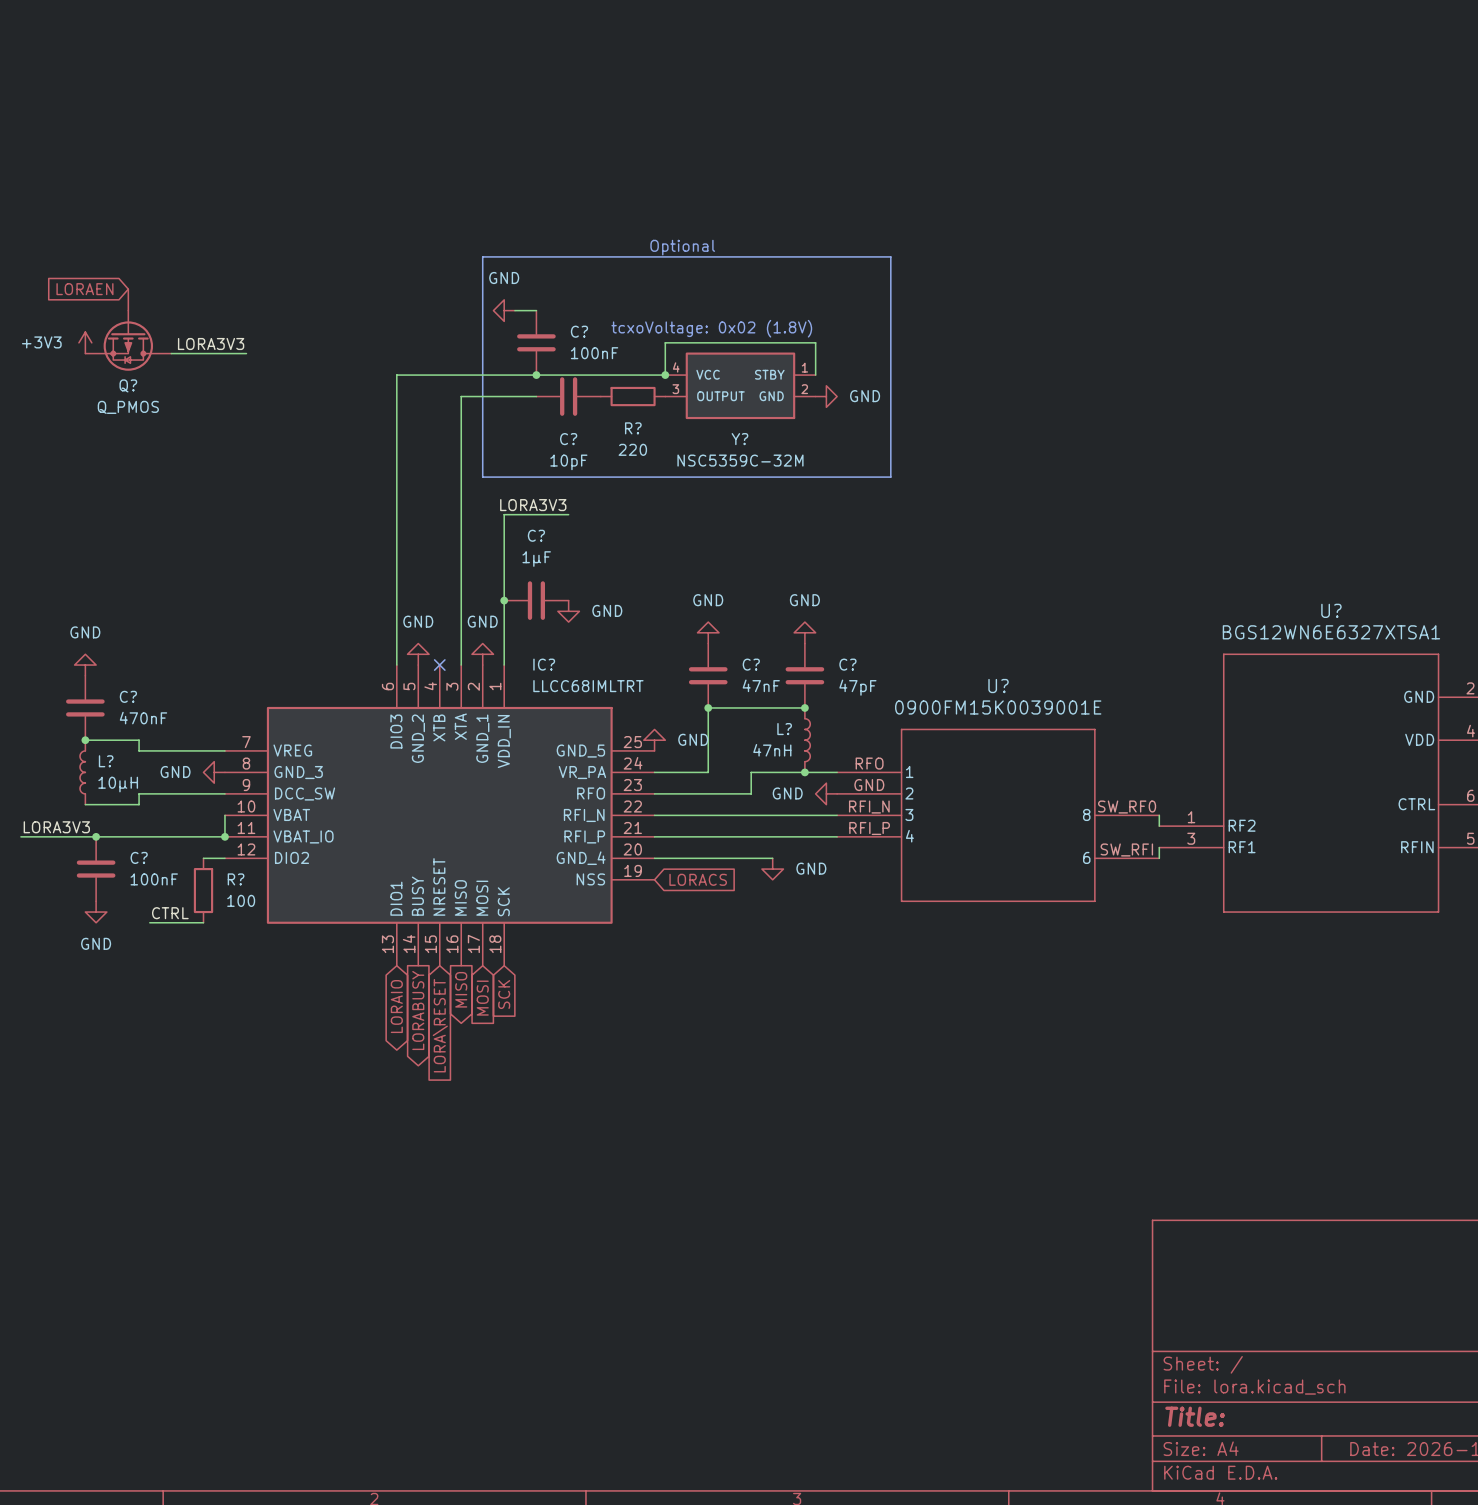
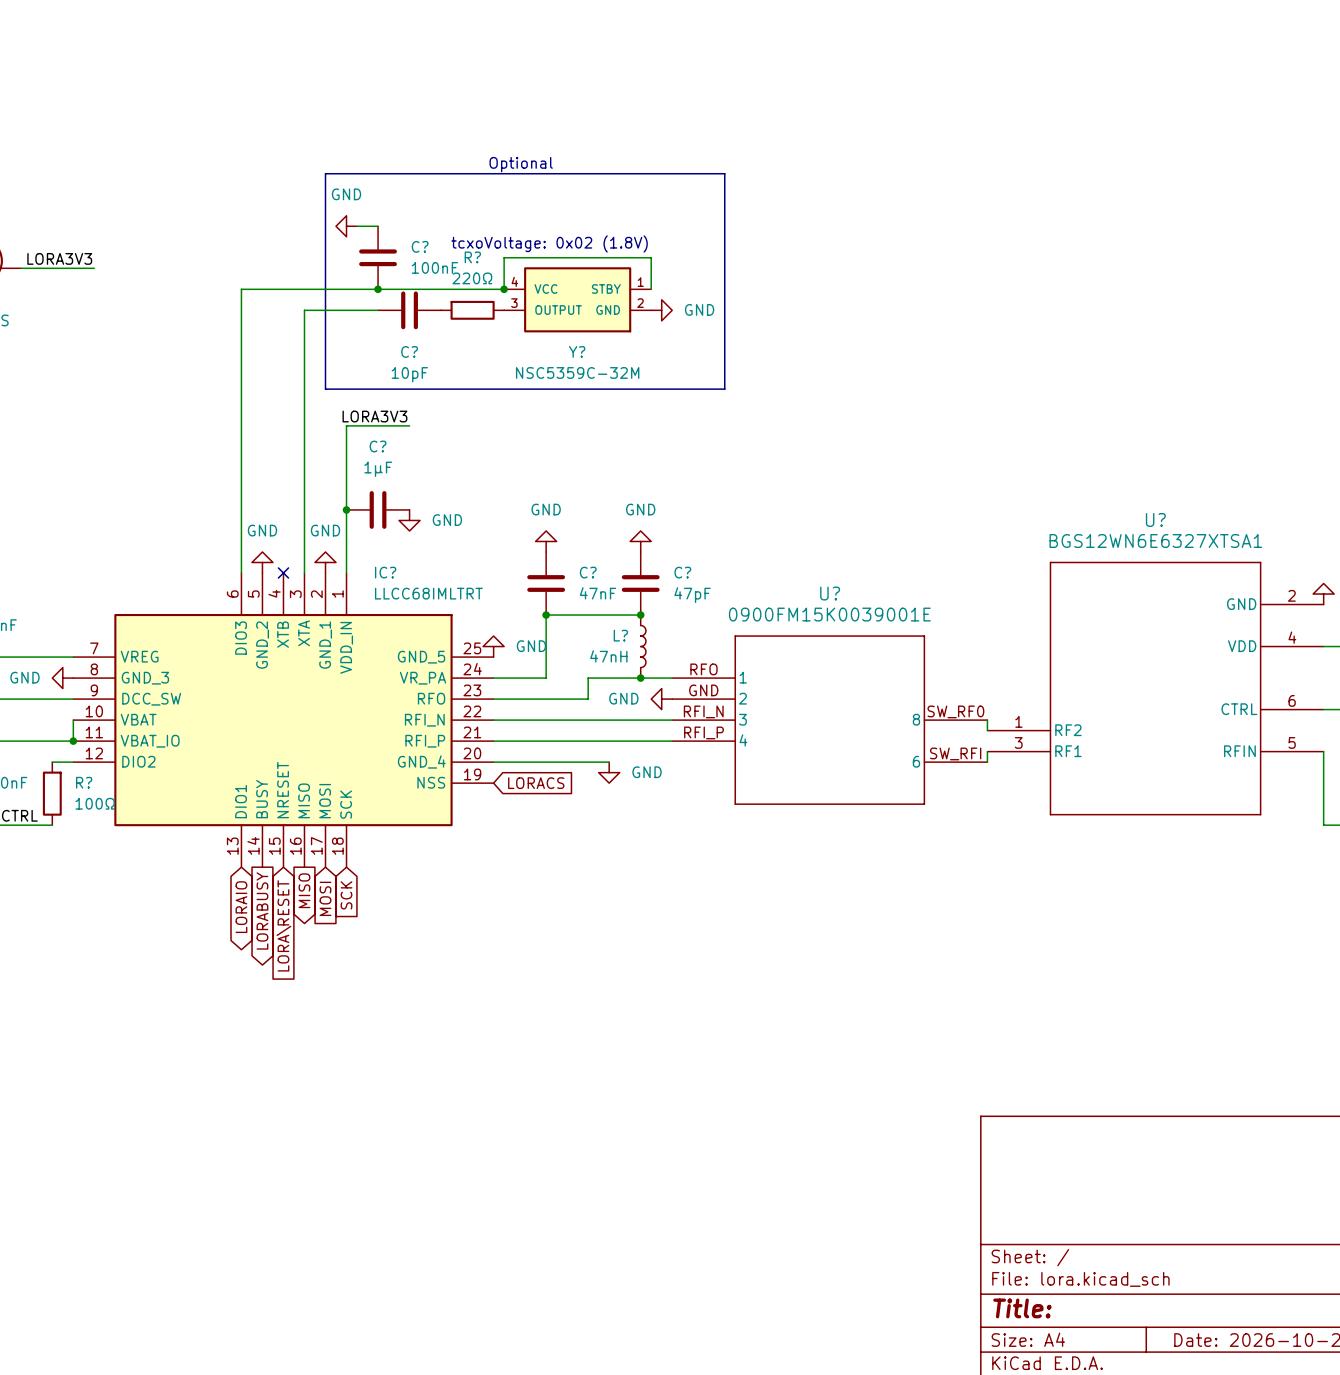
R? name position: R? (633, 428) -> R? (472, 257)
R? value: 220 (632, 449) -> 220Ω (472, 278)
R? value: 100 (241, 900) -> 100Ω (95, 803)

